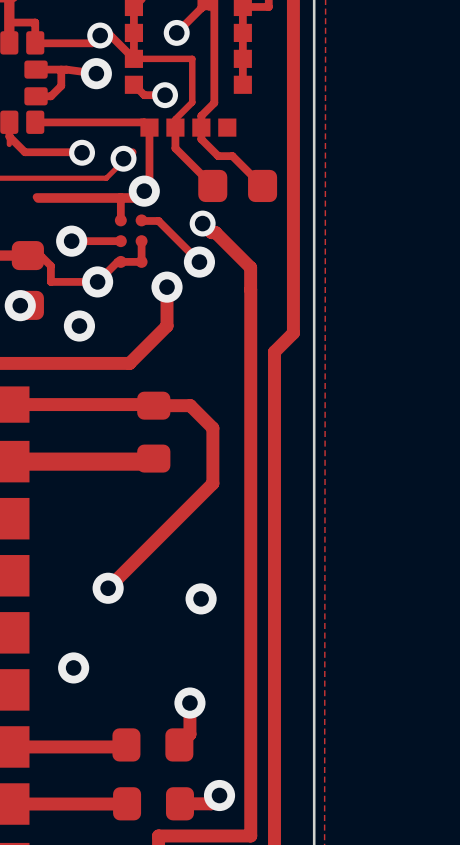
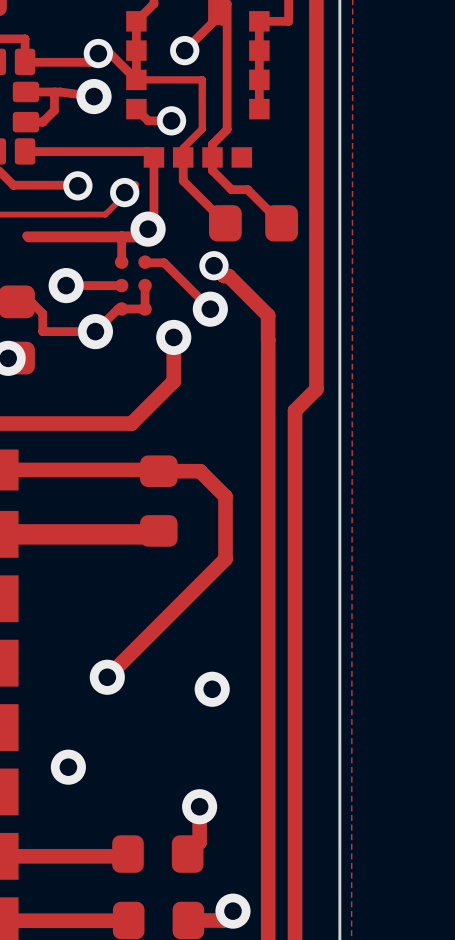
via: (79, 326) -> none

